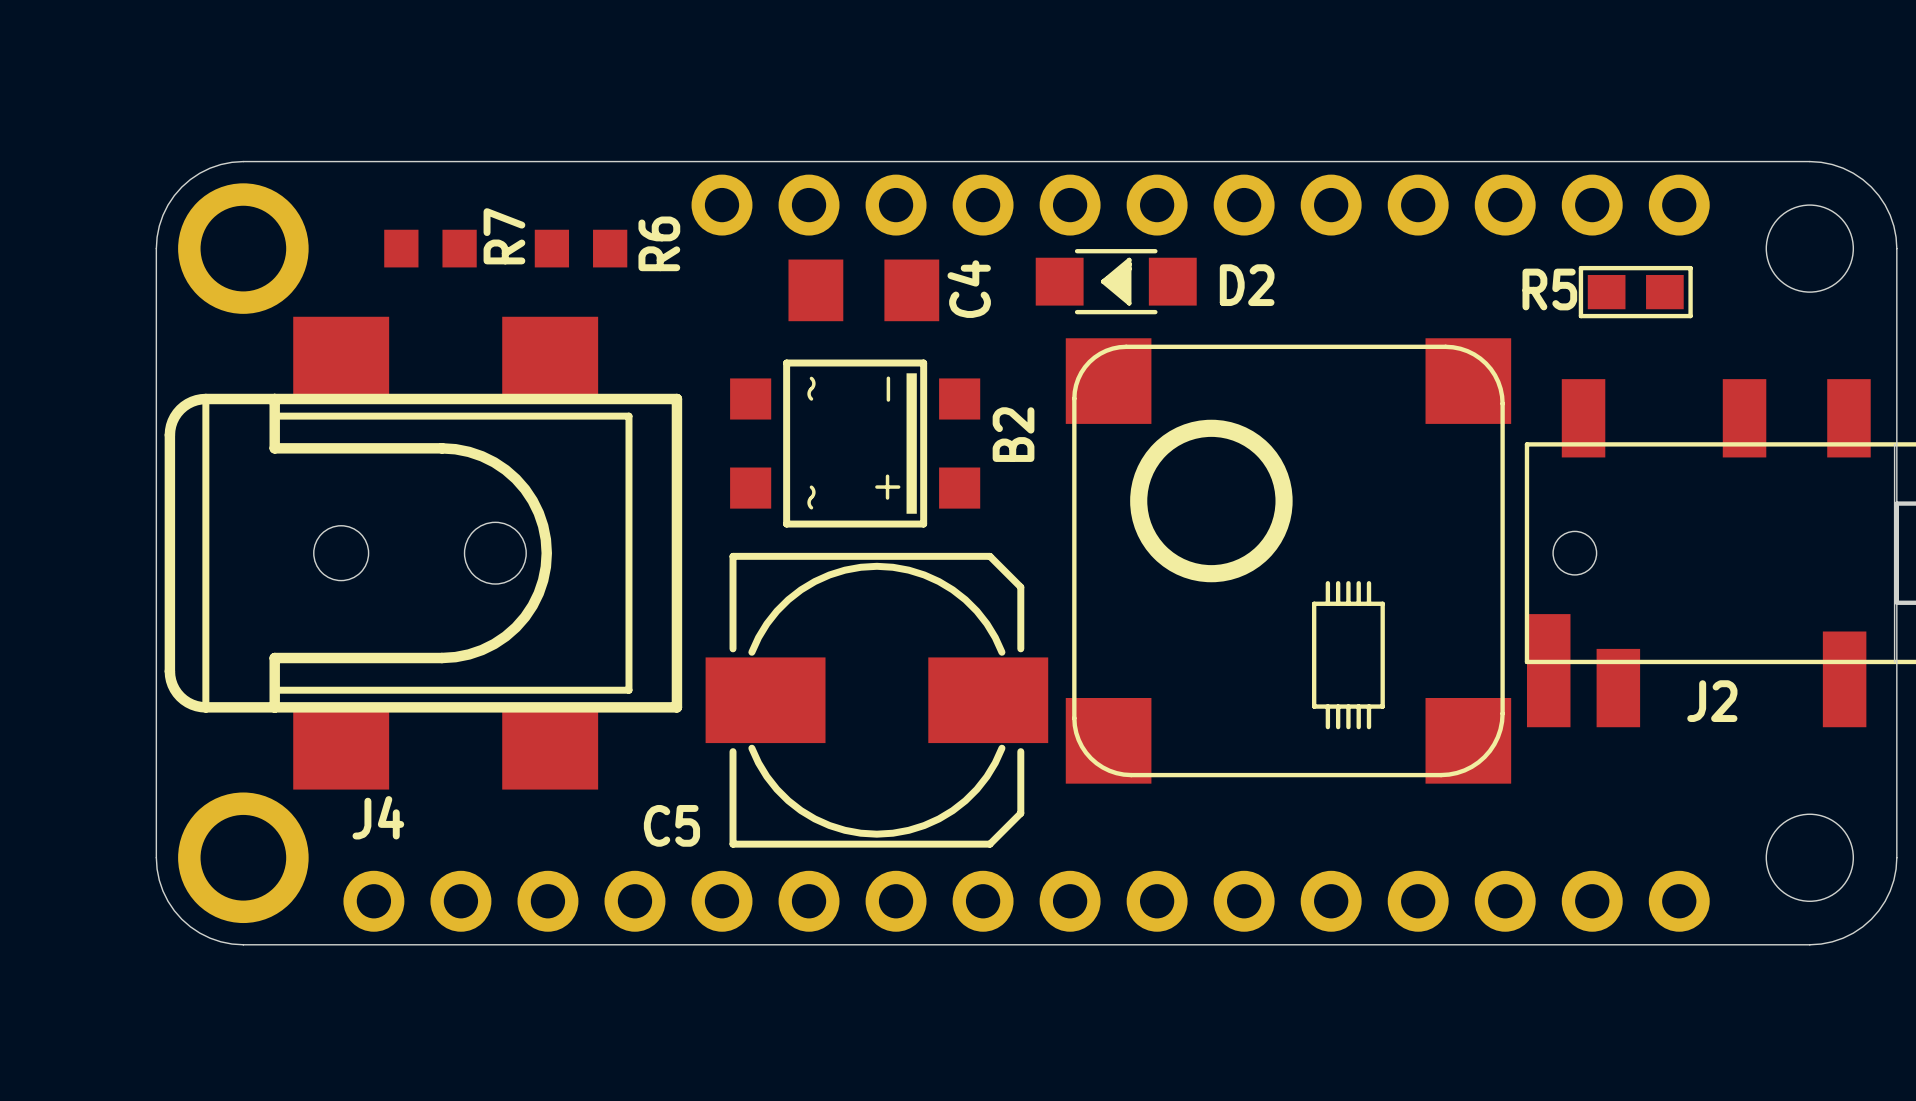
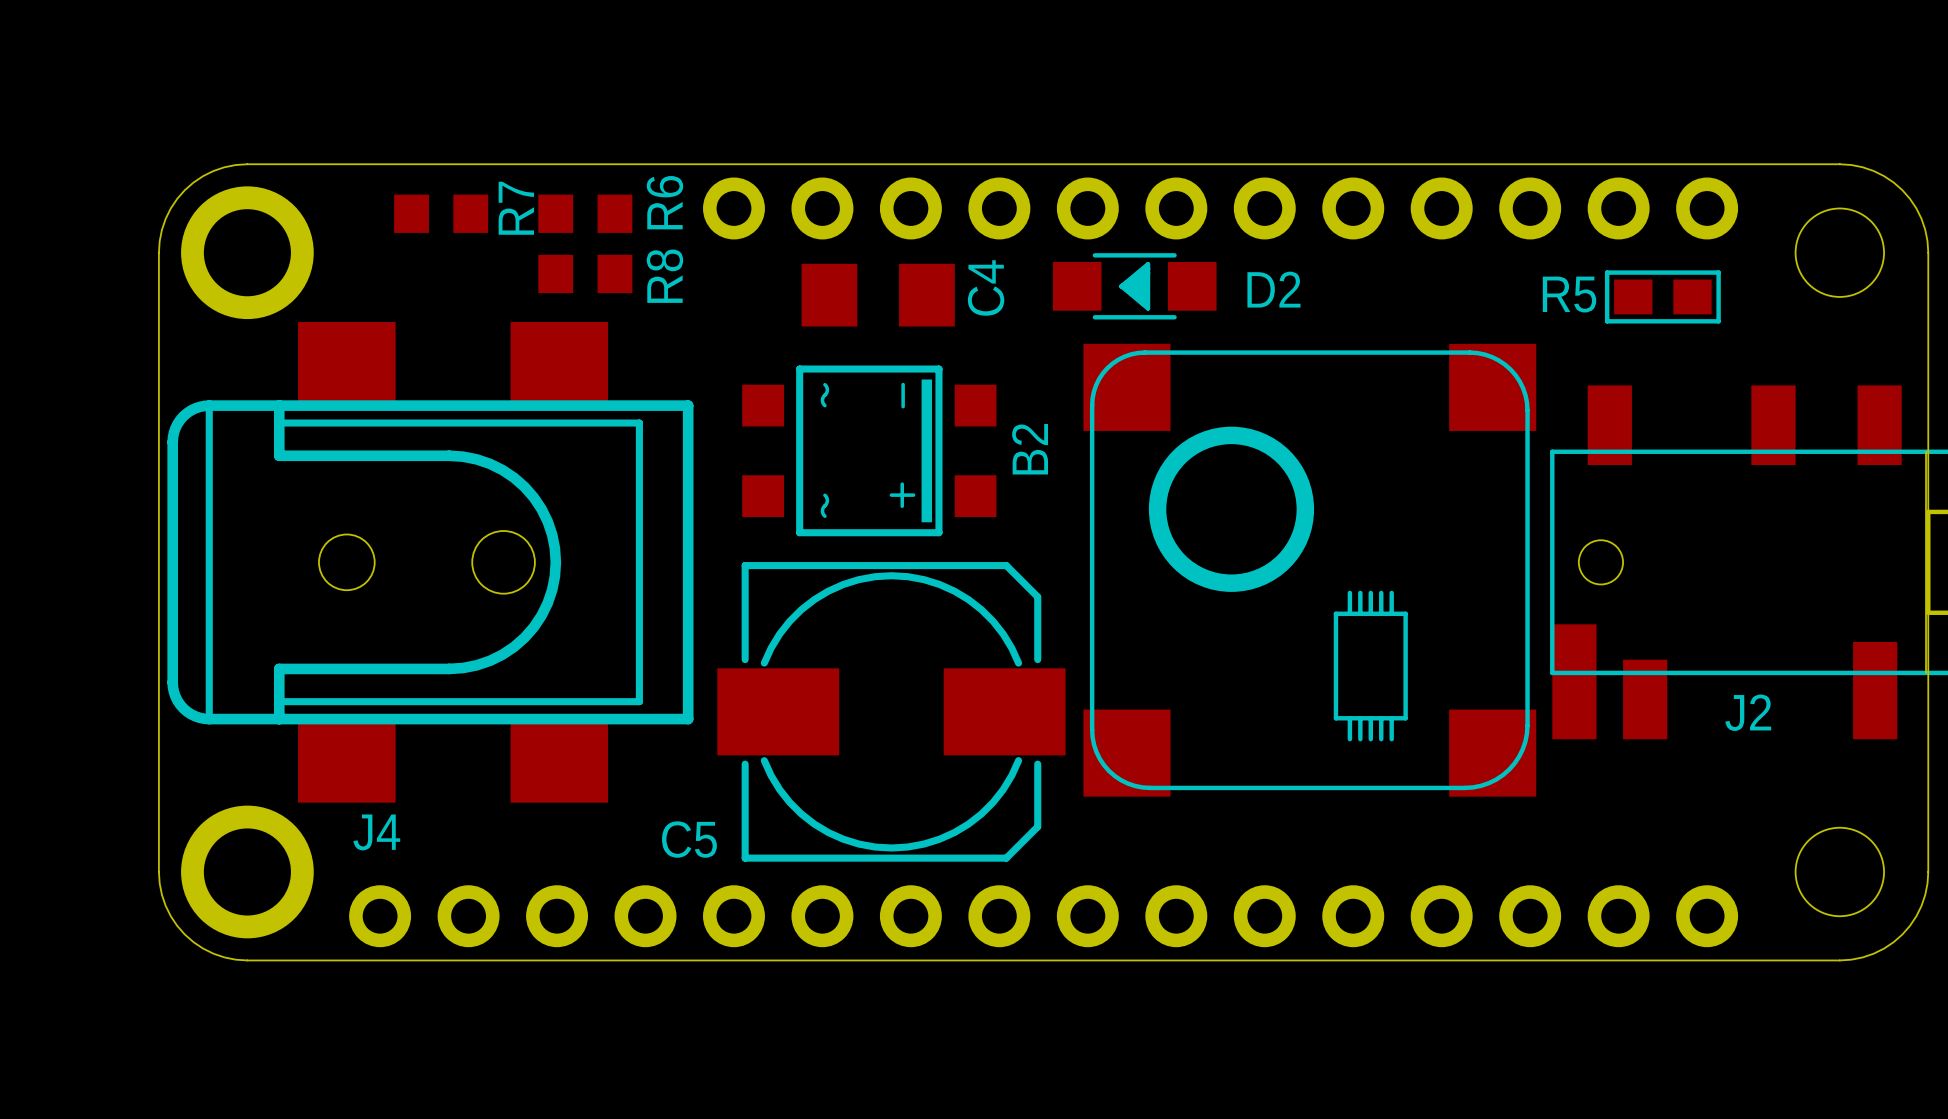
R7 position: (430, 248) -> (441, 213)
R6 position: (581, 248) -> (585, 213)
R8: none -> (585, 273)

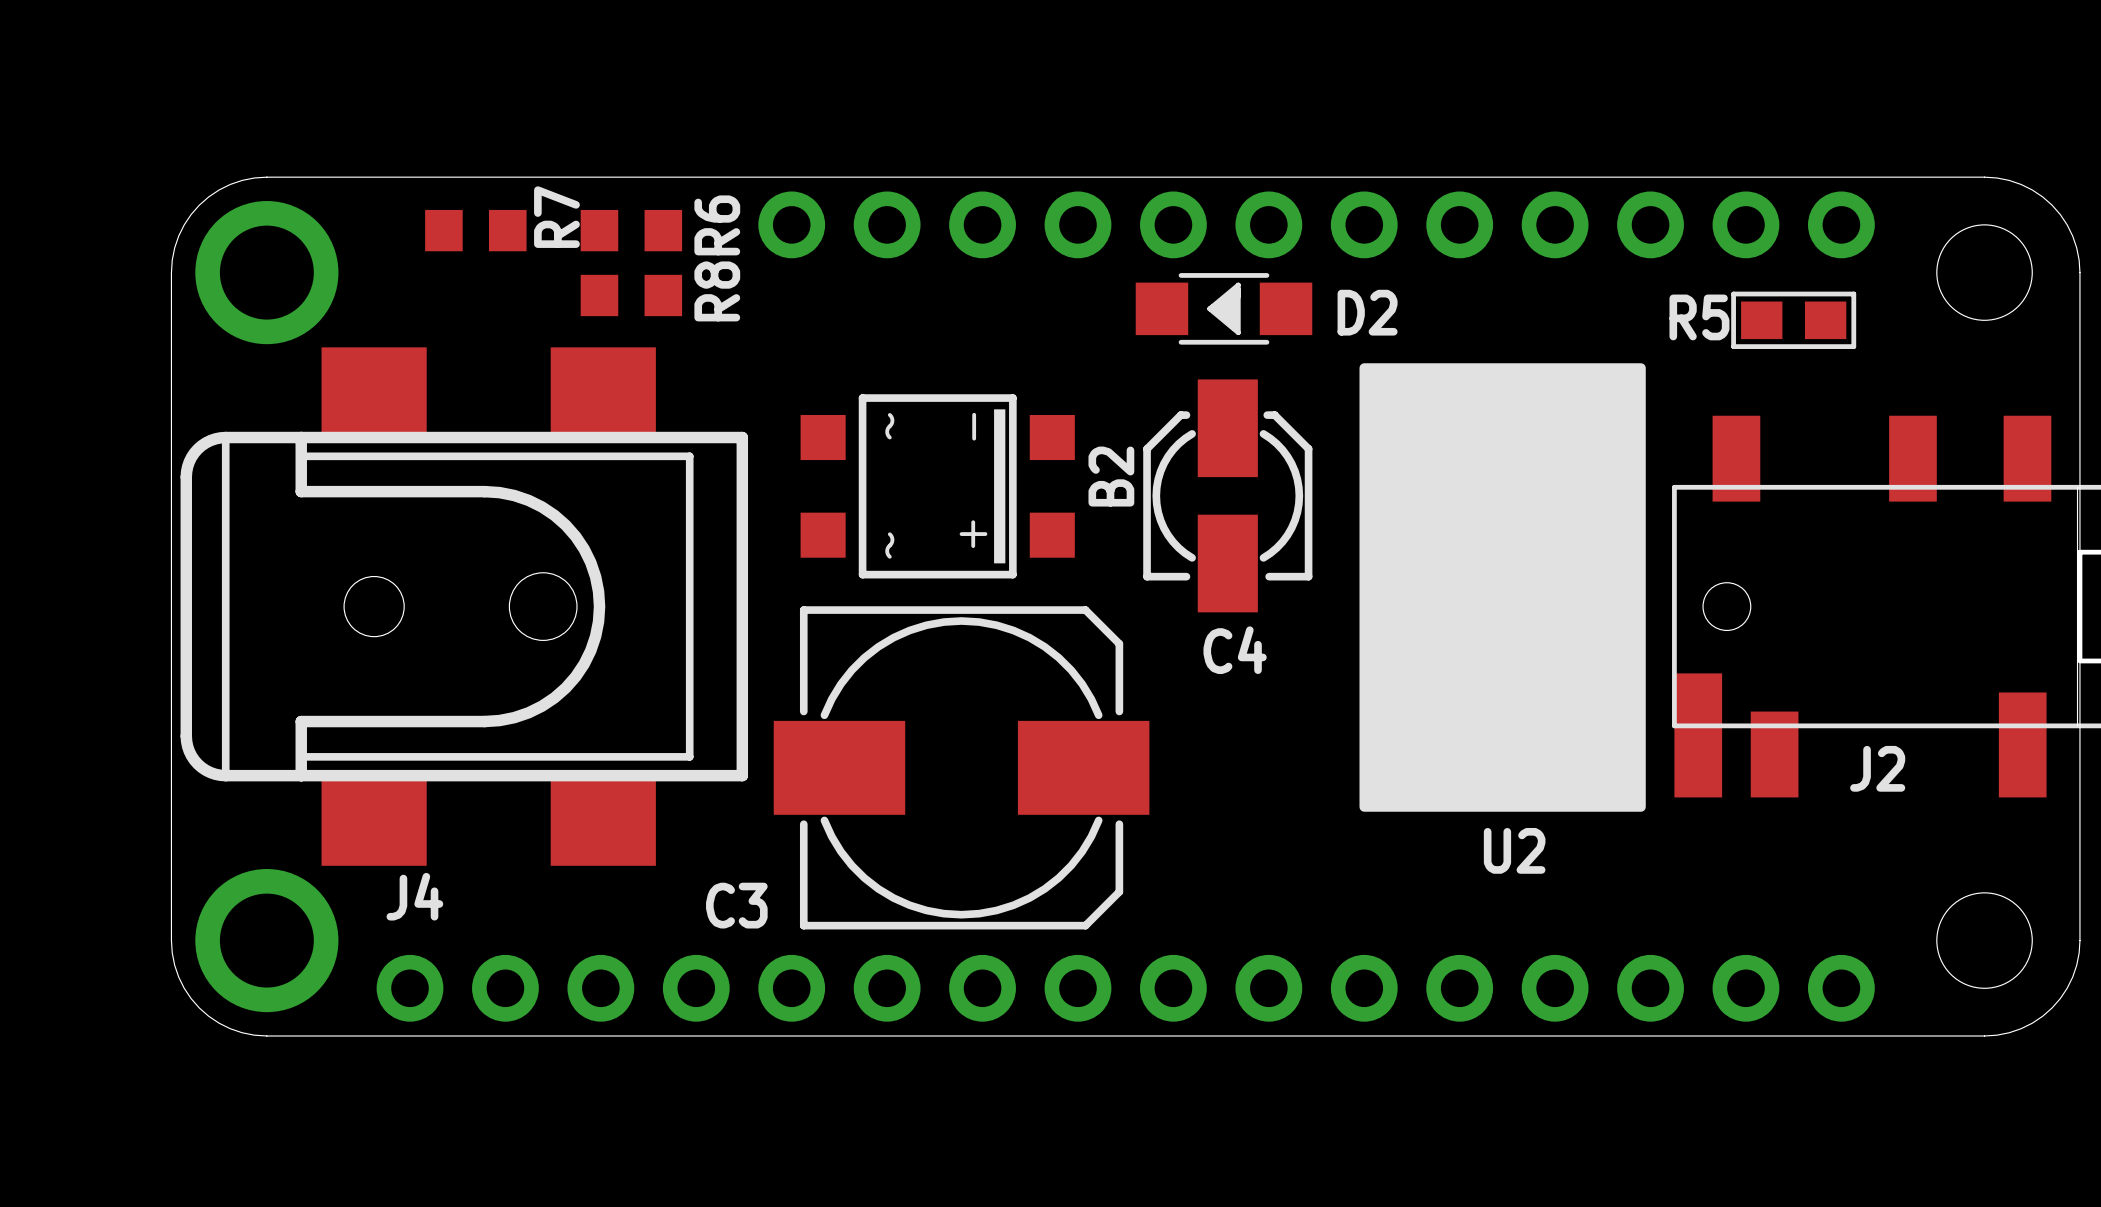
C4 footprint: [801, 263, 955, 327] -> [1143, 379, 1313, 613]
C4 name position: C4 (986, 288) -> C4 (1235, 650)
U2: none -> (1502, 587)
part: (1309, 570) -> none
C5 name: C5 (689, 839) -> C3 (736, 905)

